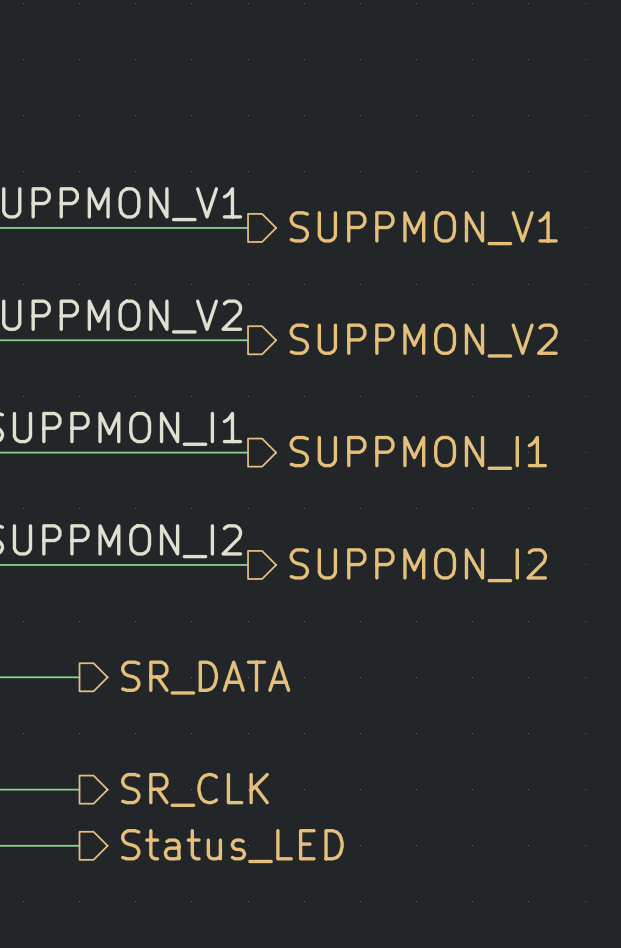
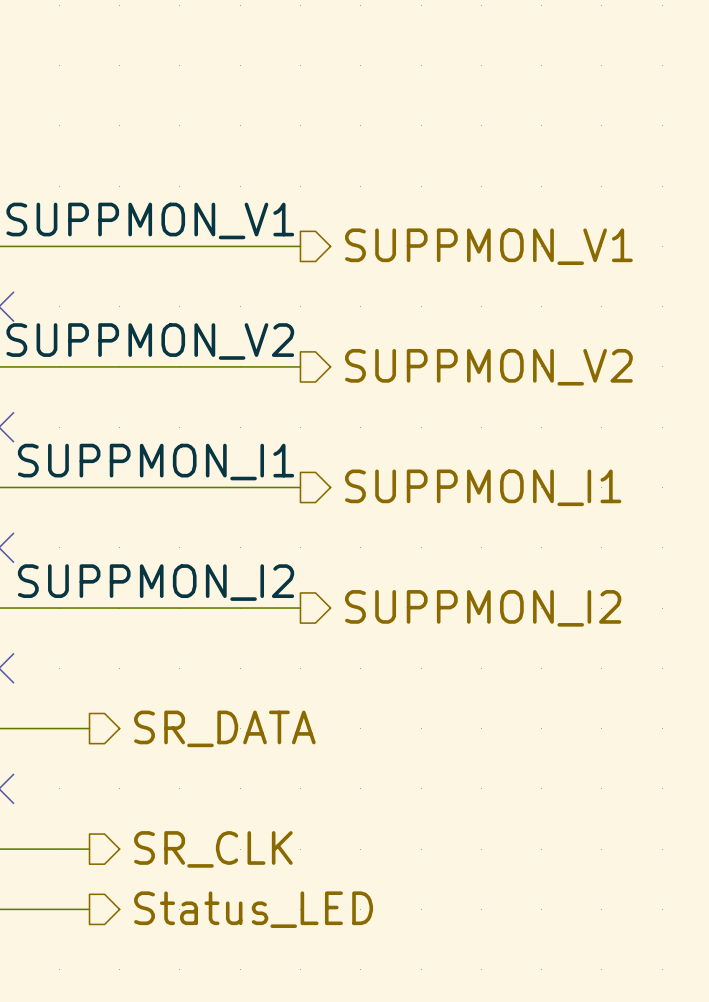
wire: (51, 677) (79, 677) -> none
hierarchical label position: SR_DATA (205, 677) -> SR_DATA (224, 728)
wire: (51, 789) (79, 789) -> none
hierarchical label position: SR_CLK (194, 789) -> SR_CLK (213, 849)
wire: (51, 845) (79, 845) -> none
hierarchical label position: Status_LED (232, 846) -> Status_LED (253, 909)

